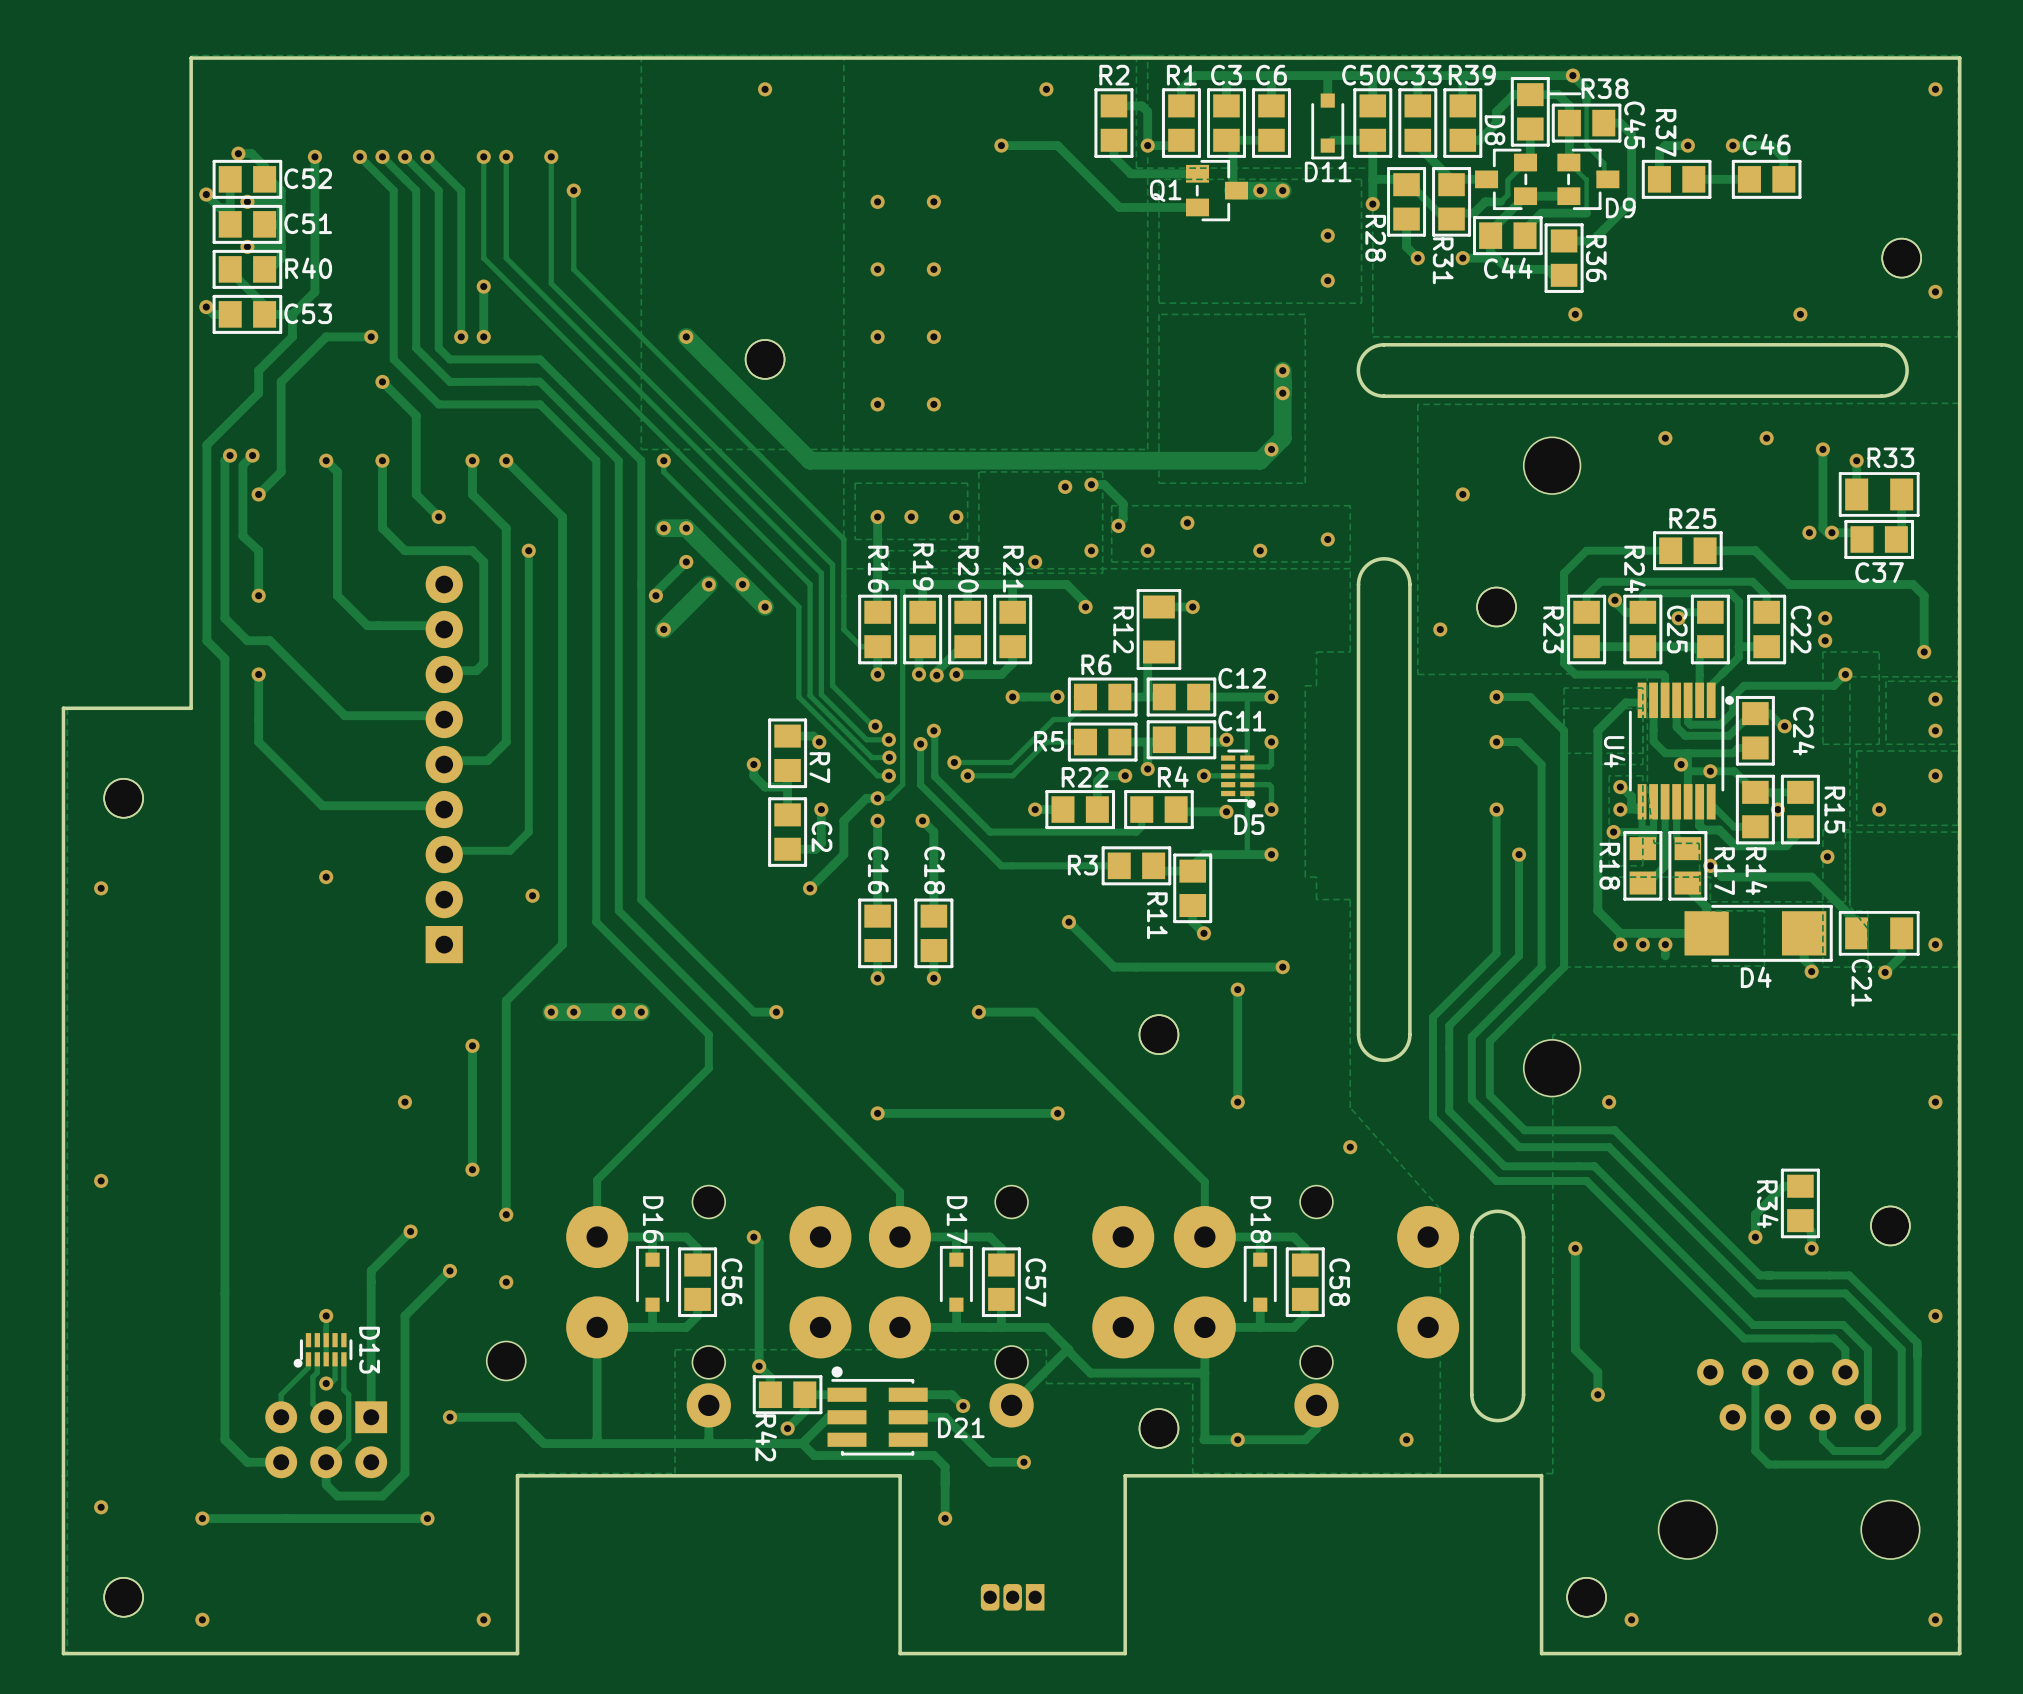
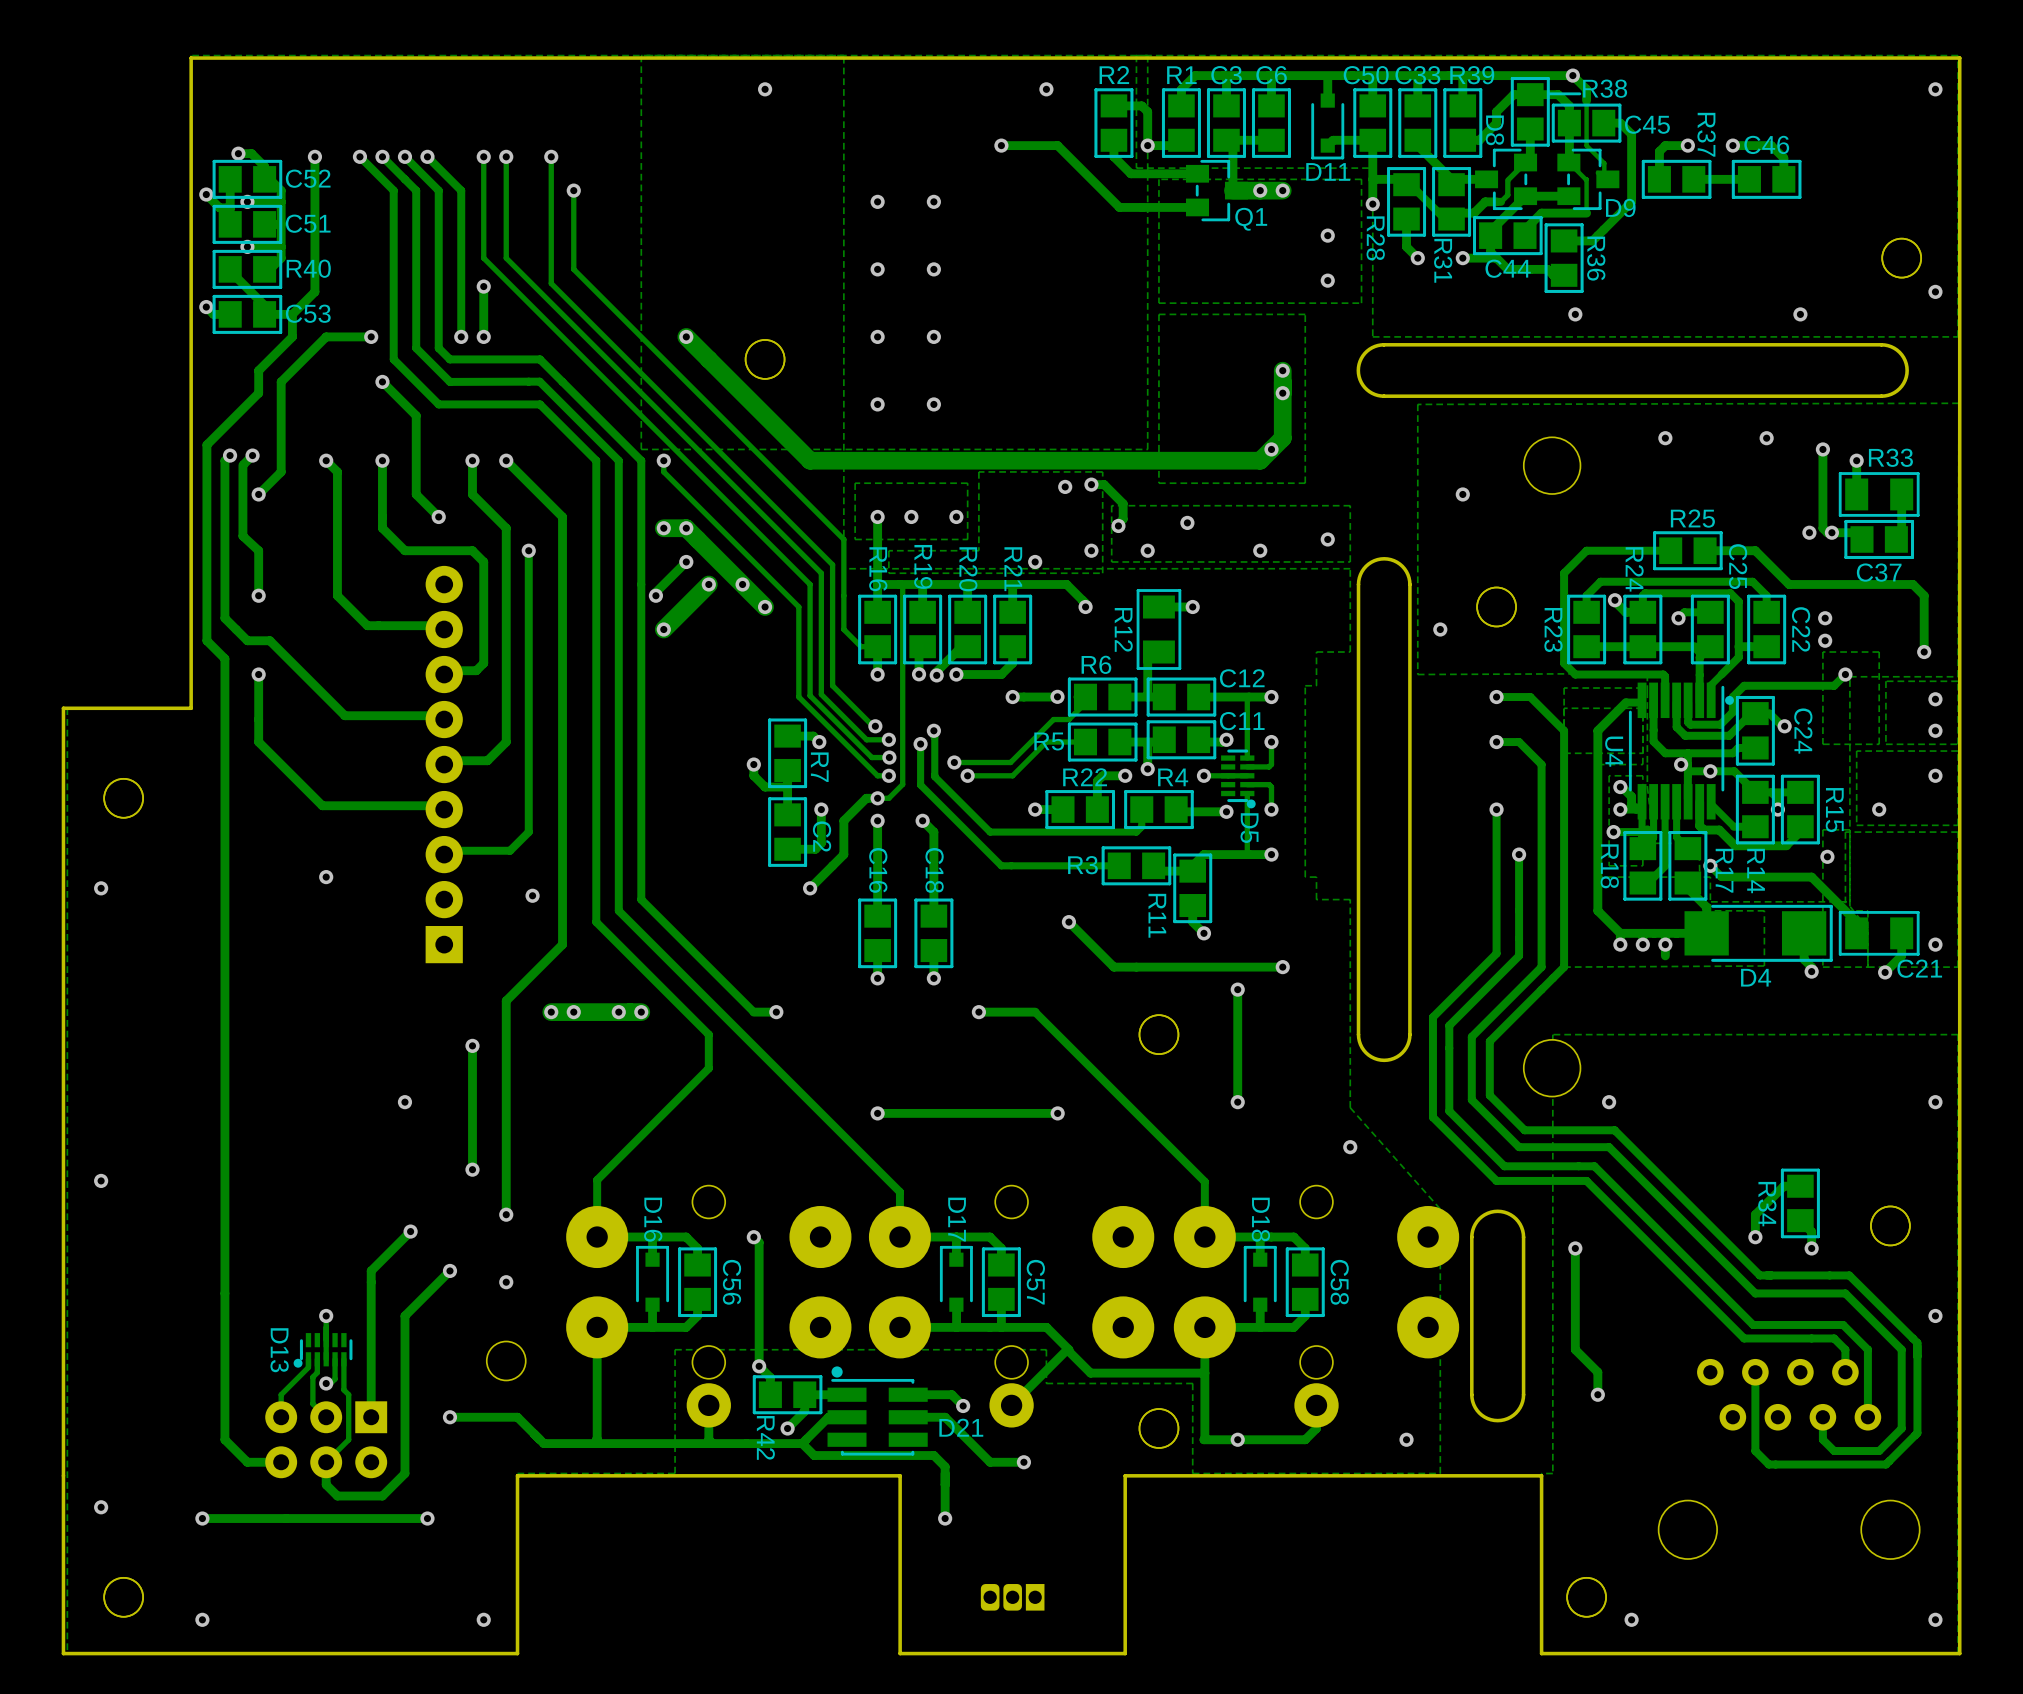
C45 name rotation: 0° (1634, 125) -> 90° counterclockwise (1647, 124)
R37 name position: R37 (1666, 132) -> R37 (1706, 134)
Q1 name position: Q1 (1165, 190) -> Q1 (1251, 219)
C25 name position: C25 (1677, 629) -> C25 (1738, 566)
D5 name rotation: 0° (1249, 824) -> 90° clockwise (1249, 828)
C21 name rotation: 0° (1861, 982) -> 90° counterclockwise (1919, 968)
D13 name position: D13 (369, 1350) -> D13 (279, 1350)

